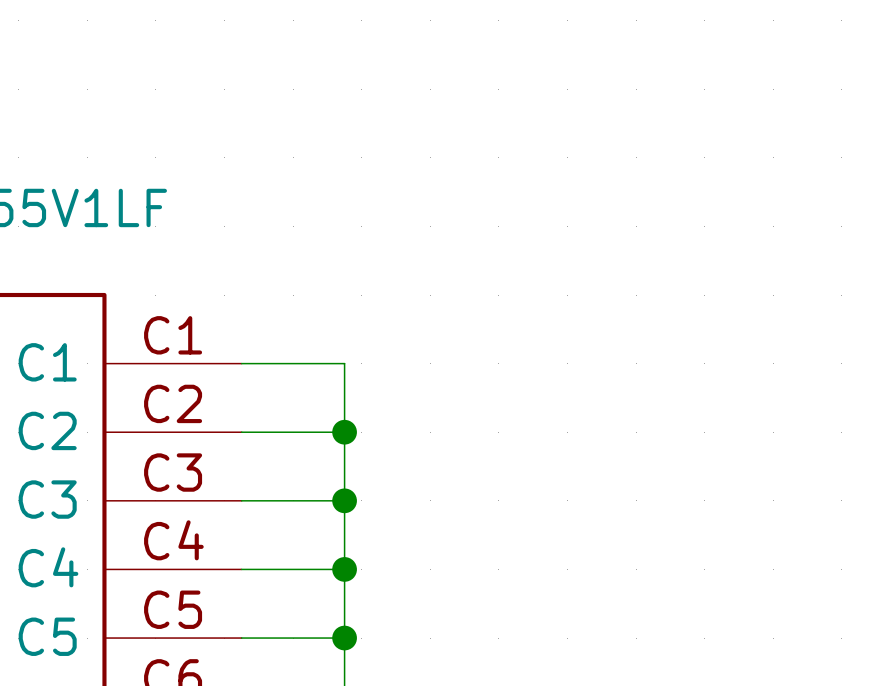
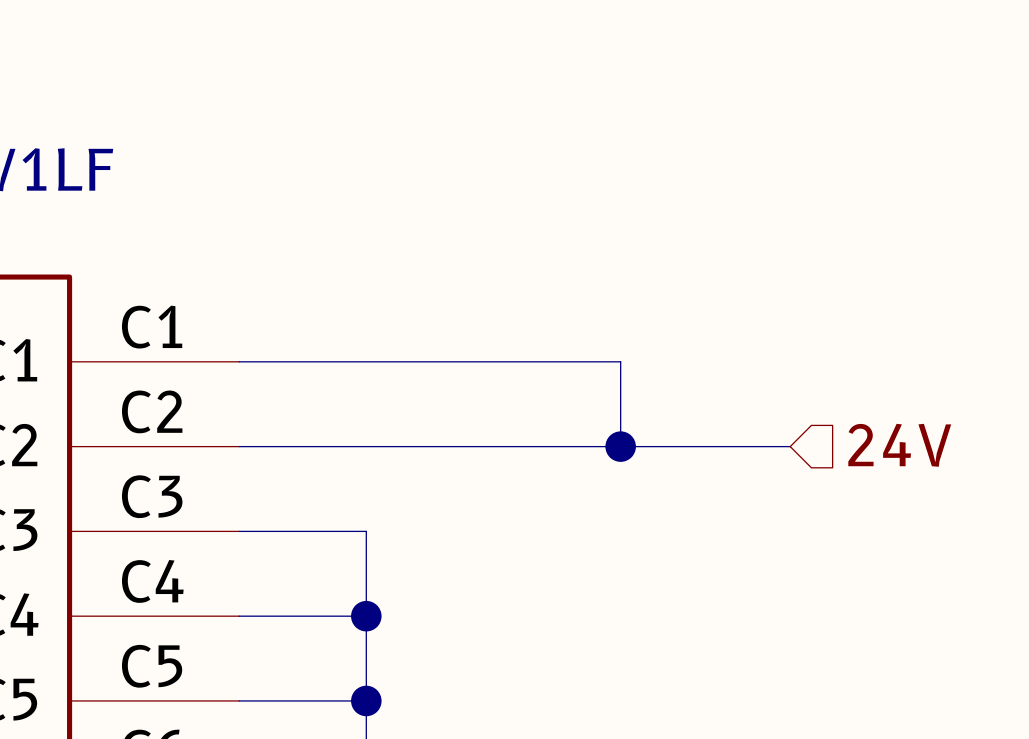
wire: (344, 363) (344, 500) -> (366, 361) (620, 361) (620, 446)
hierarchical label: none -> 24V (899, 445)
wire: none -> (366, 446) (790, 446)
junction: (344, 432) -> none
junction: none -> (620, 446)
junction: (344, 500) -> none

